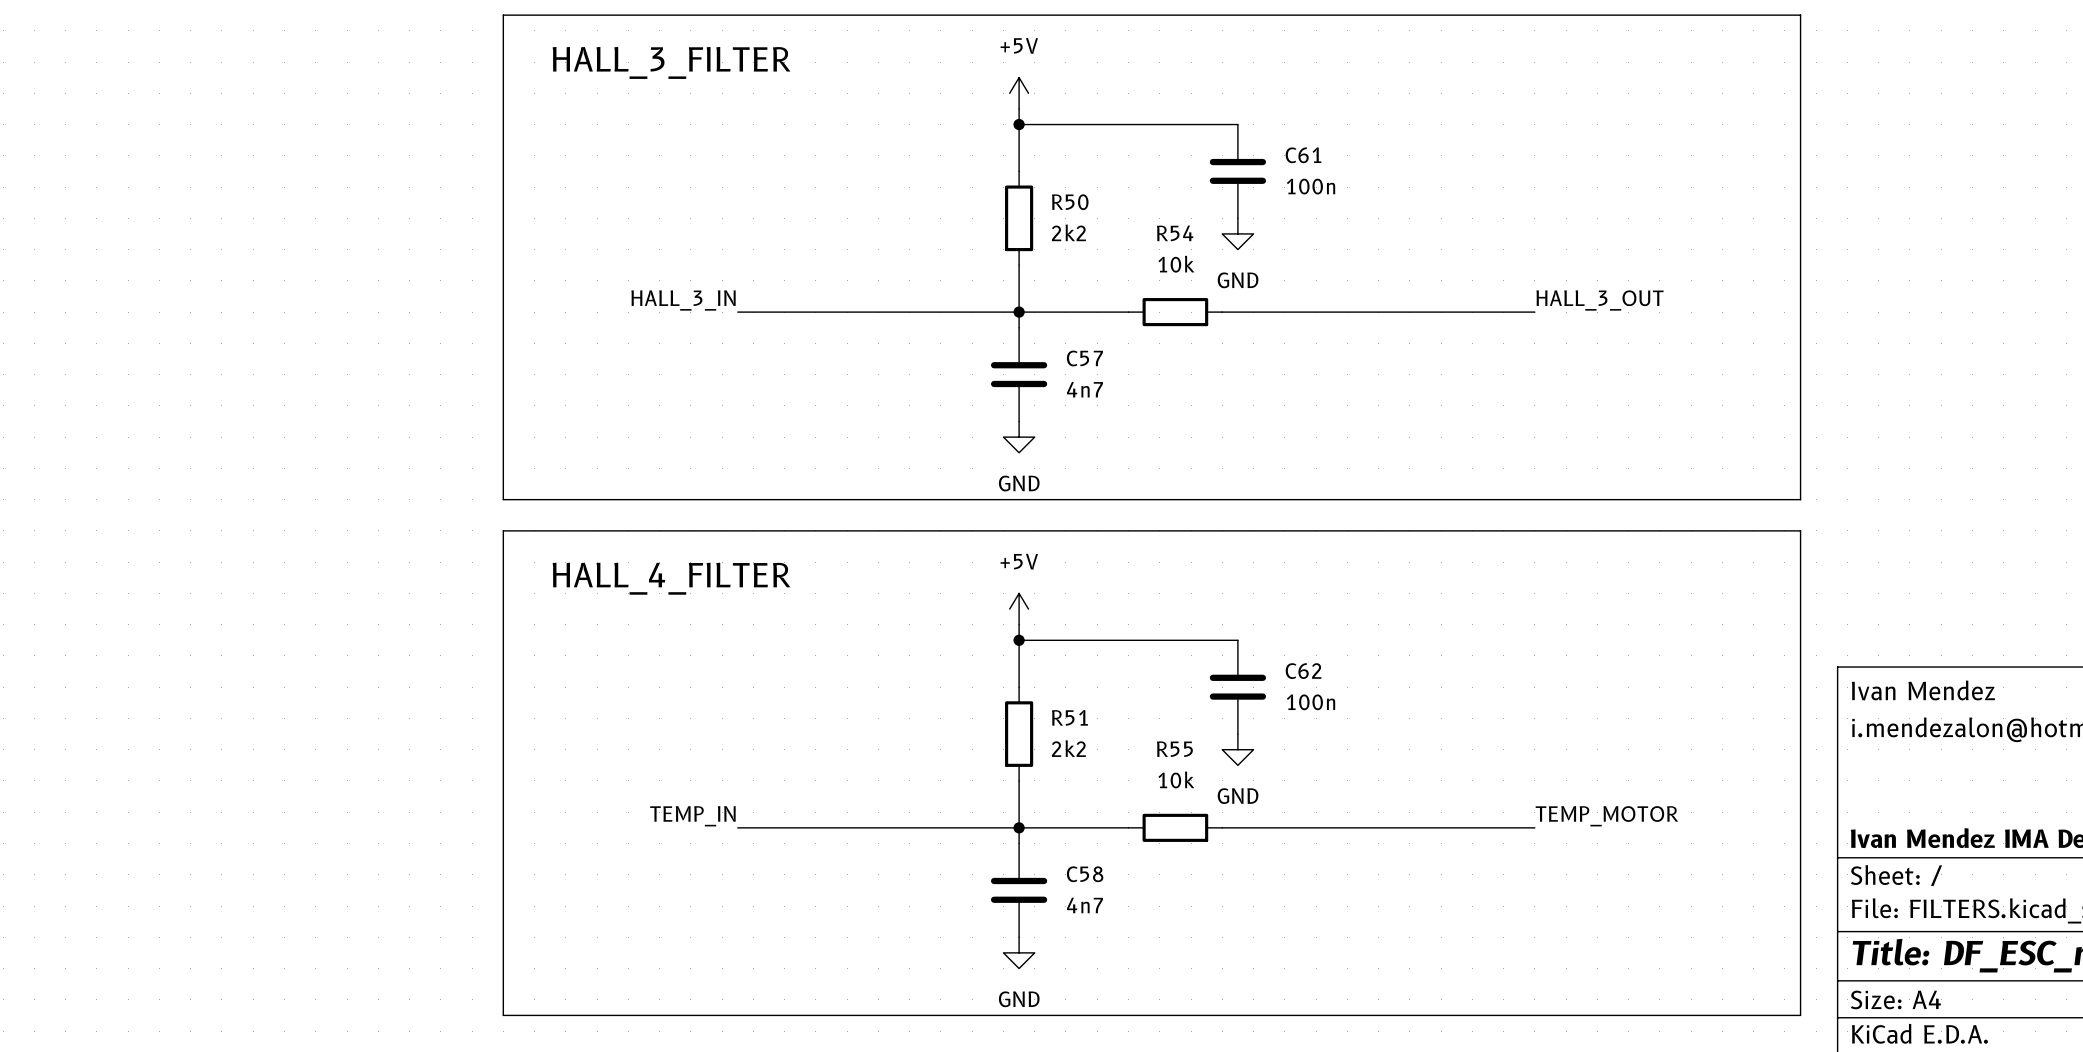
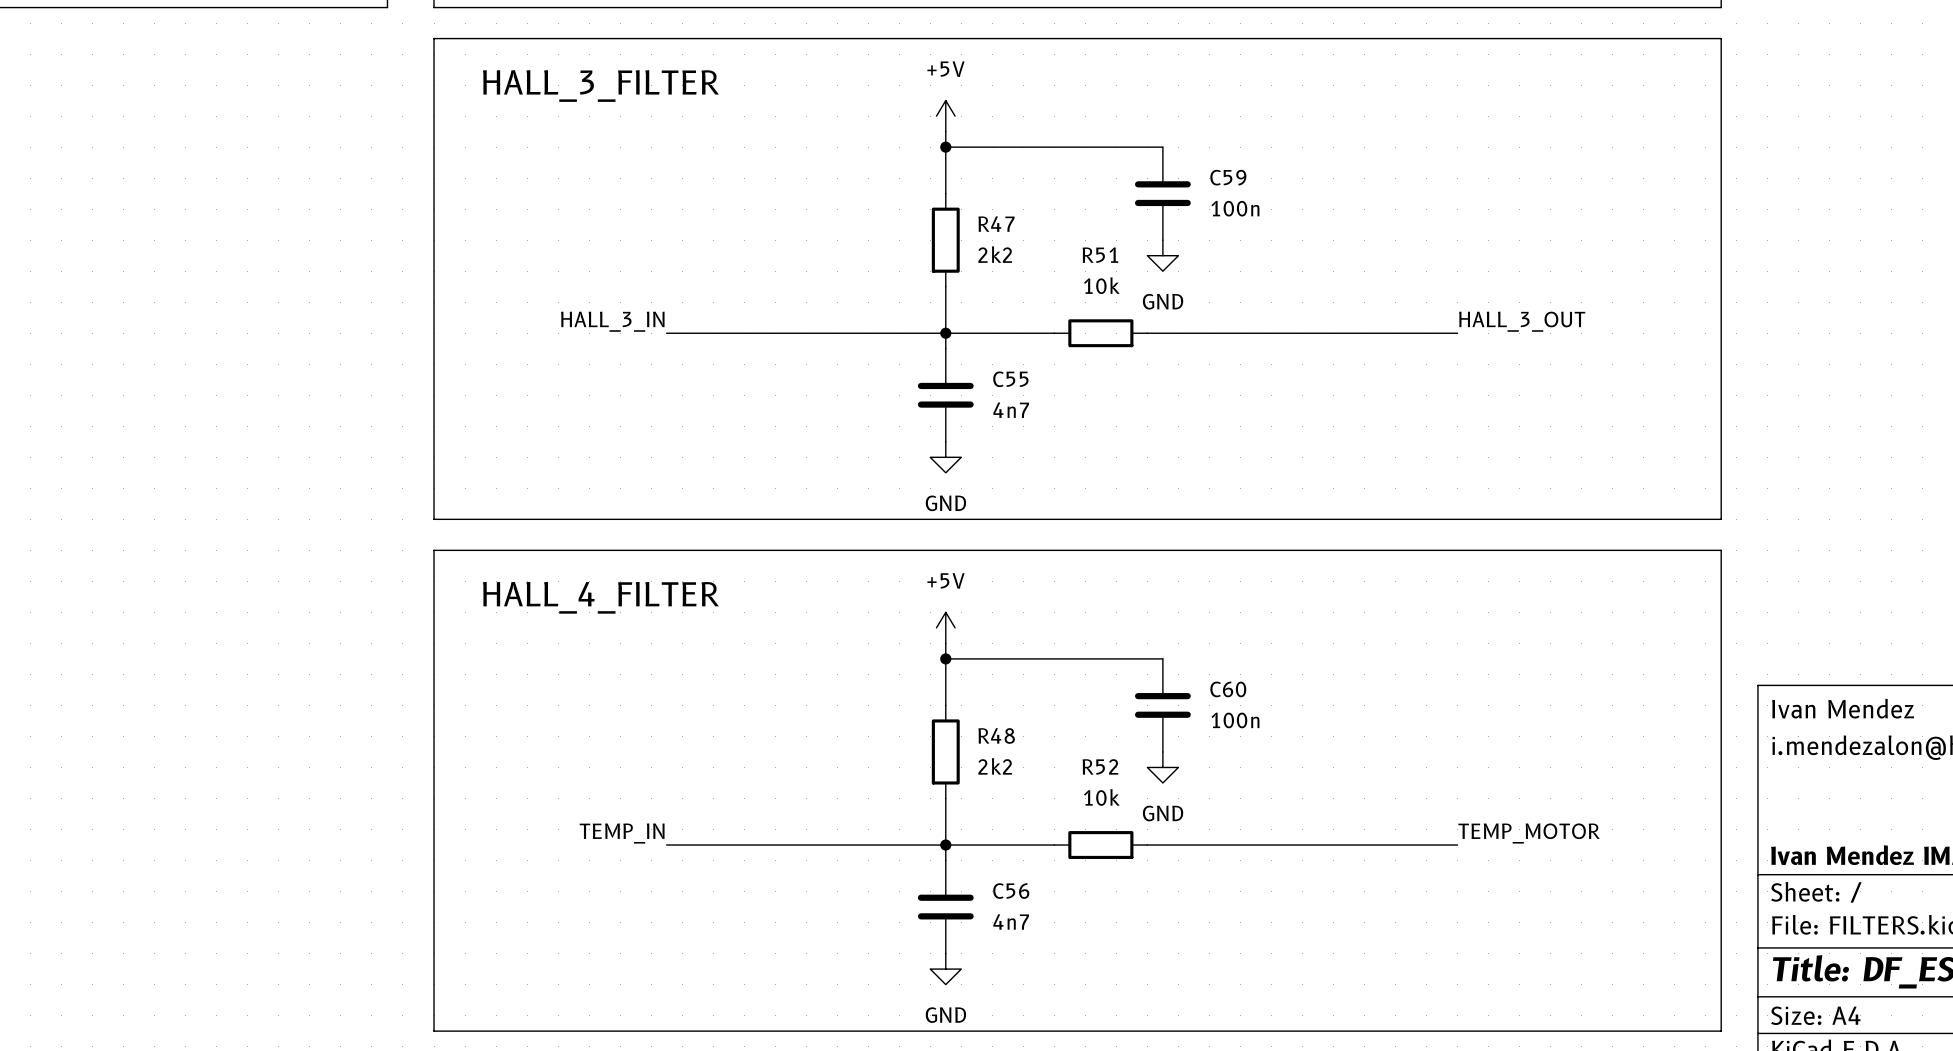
C61 name: C61 (1303, 155) -> C59 (1228, 177)
R50 name: R50 (1070, 202) -> R47 (996, 224)
R54 name: R54 (1175, 233) -> R51 (1100, 255)
C57 name: C57 (1084, 358) -> C55 (1010, 379)
C62 name: C62 (1303, 671) -> C60 (1228, 689)
R51 name: R51 (1069, 717) -> R48 (996, 735)
R55 name: R55 (1174, 749) -> R52 (1100, 766)
C58 name: C58 (1085, 874) -> C56 (1011, 891)

